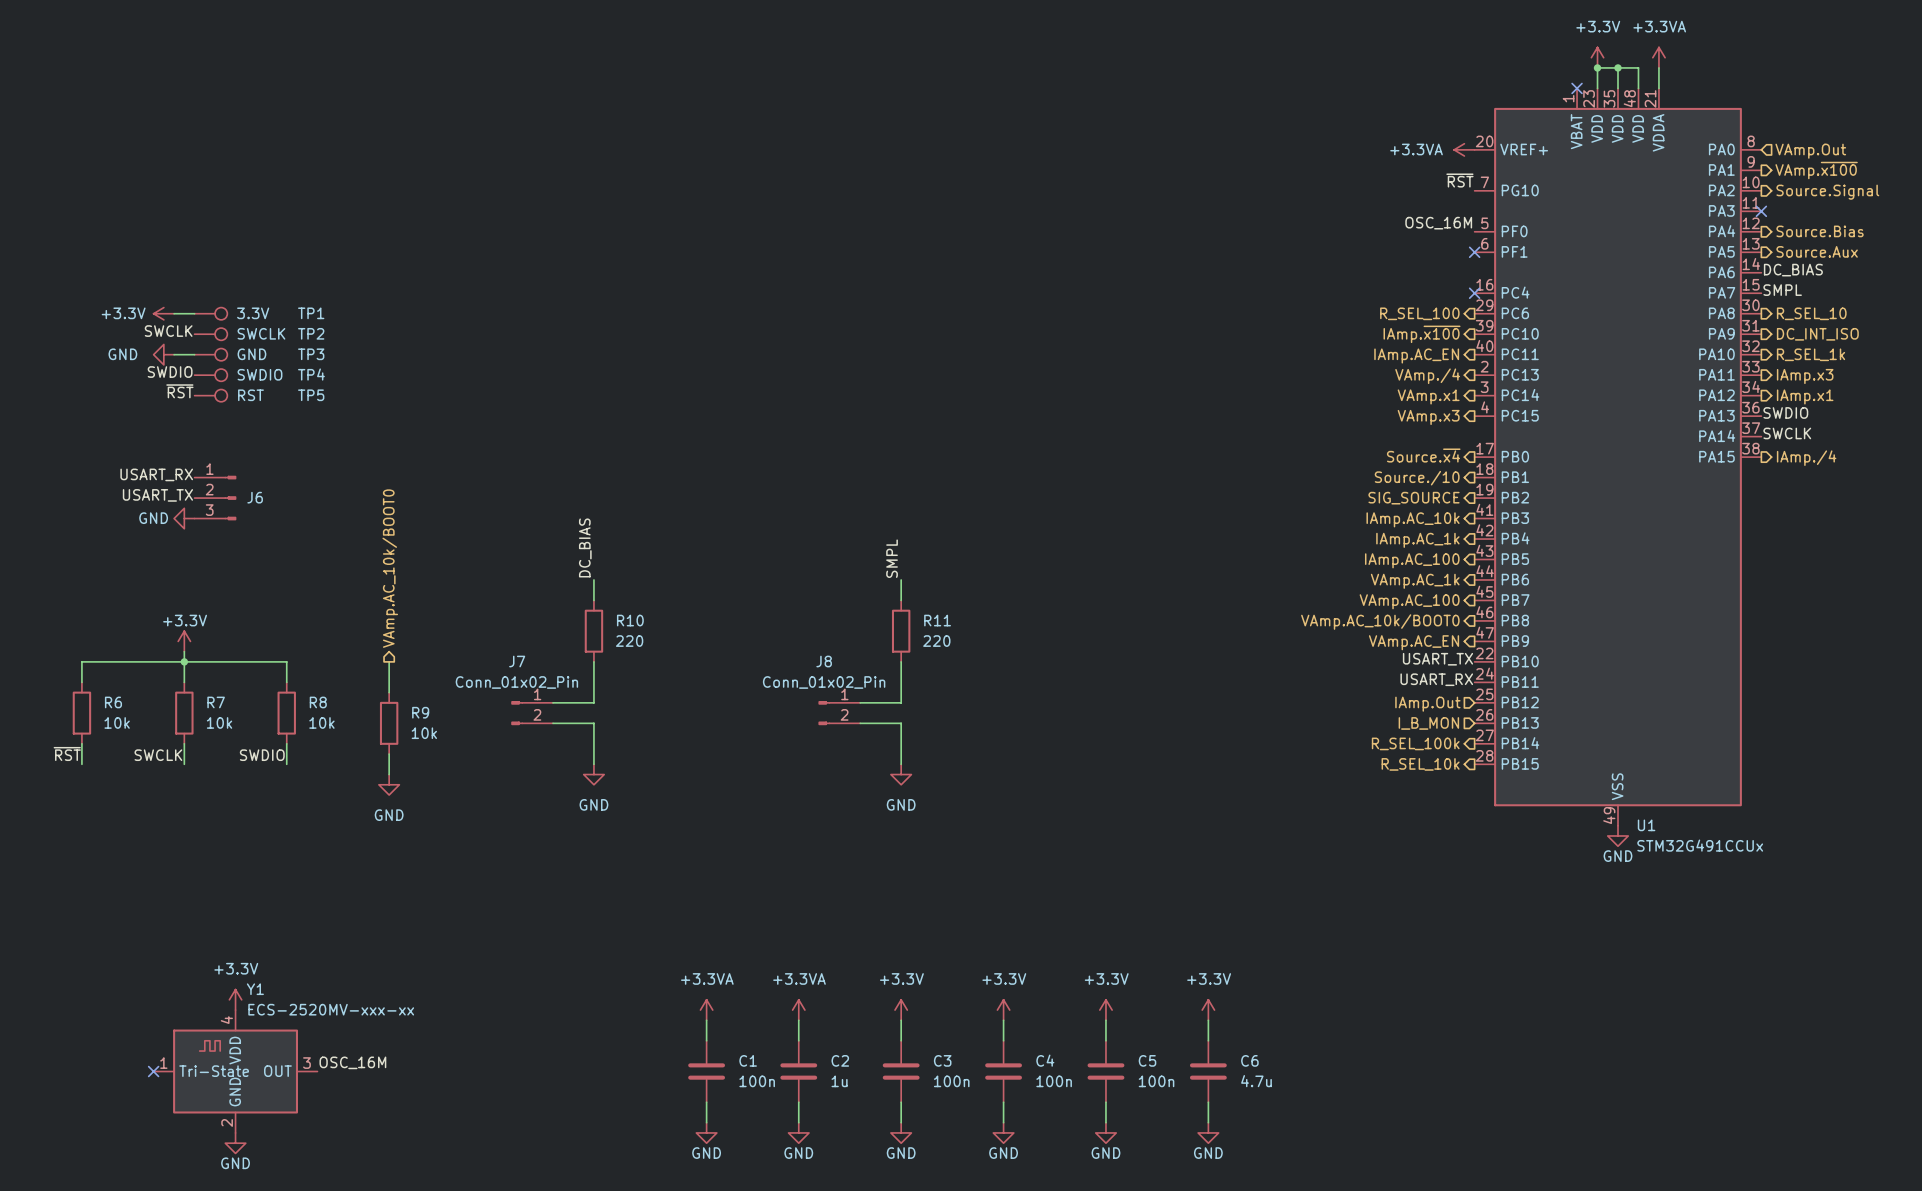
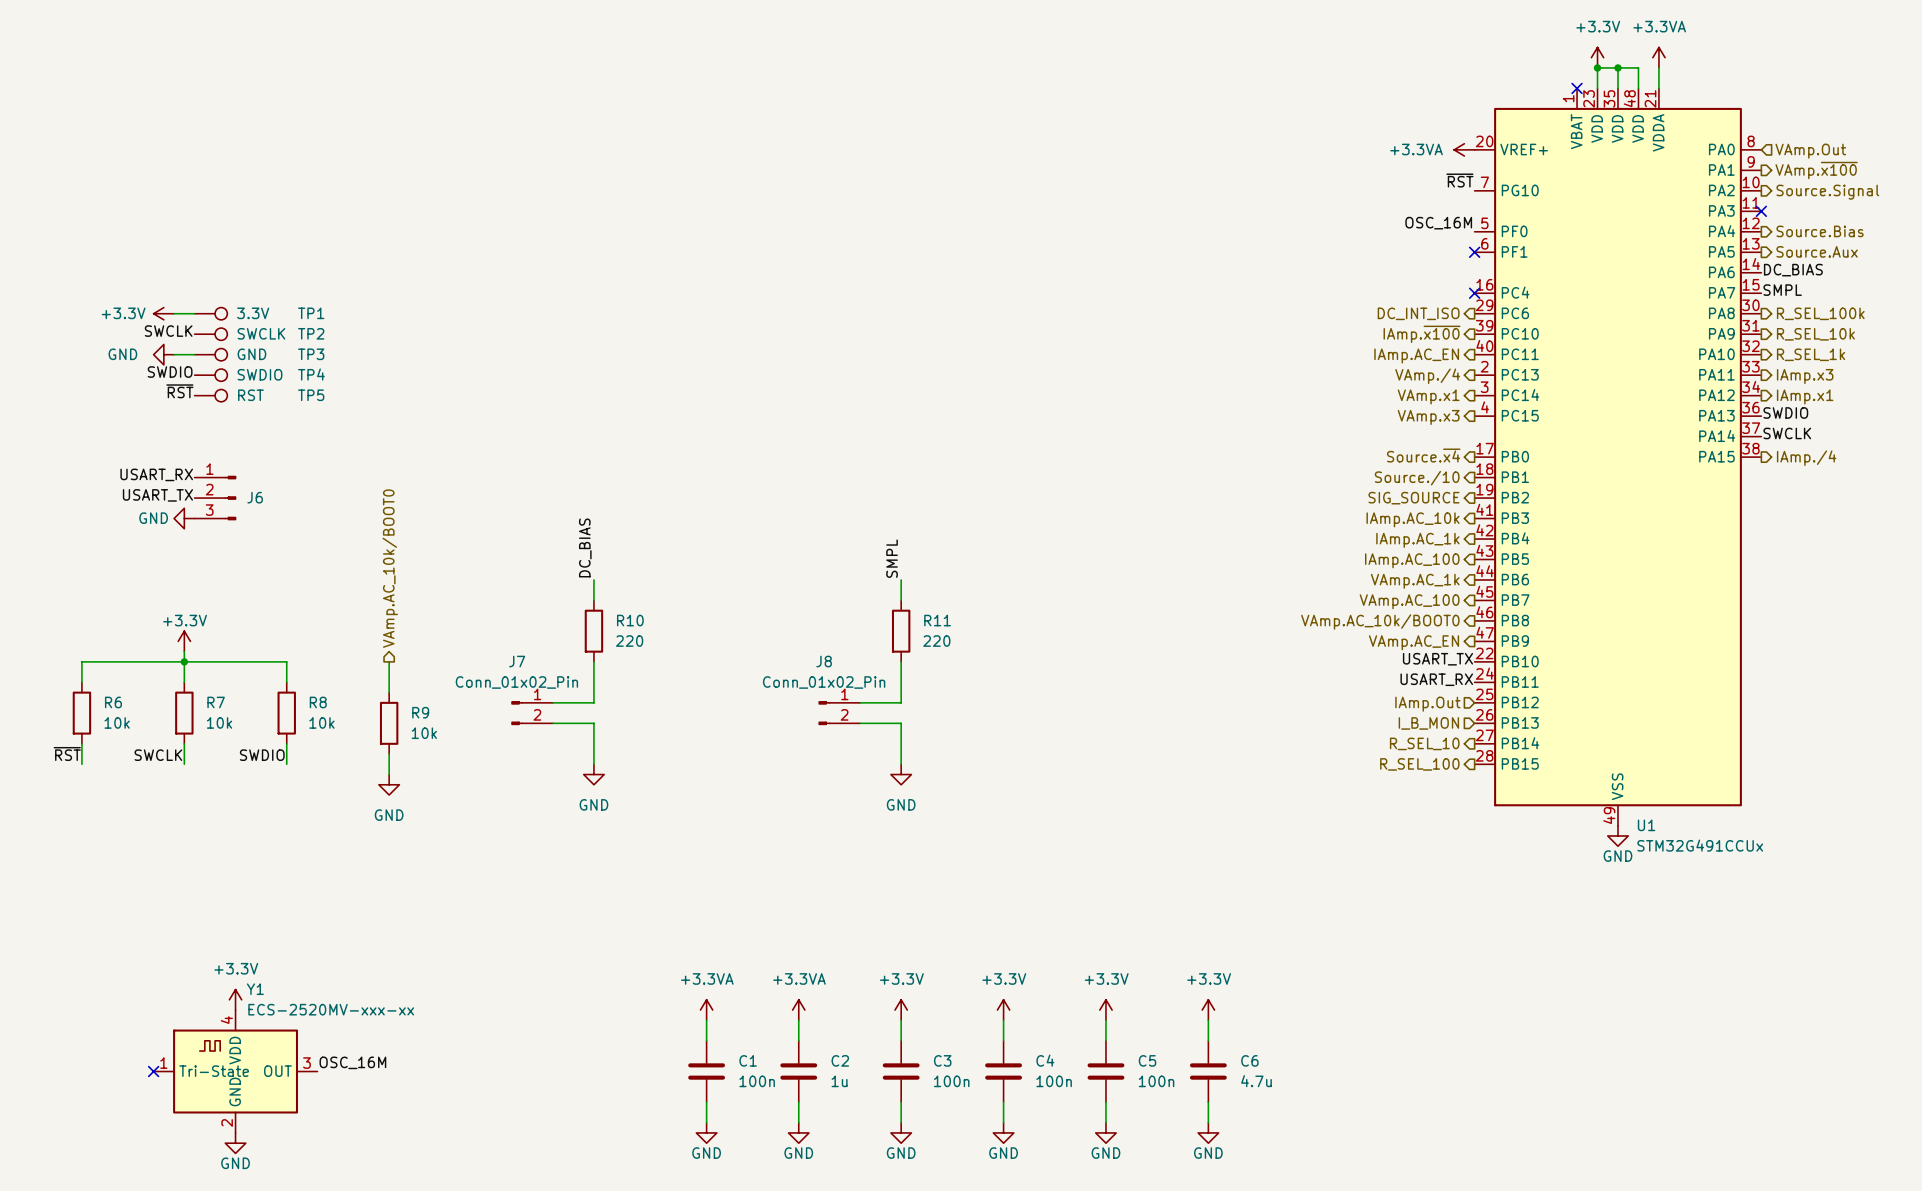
hierarchical label: R_SEL_100 (1419, 313) -> DC_INT_ISO (1418, 313)
hierarchical label: R_SEL_10 (1811, 313) -> R_SEL_100k (1820, 313)
hierarchical label: DC_INT_ISO (1817, 334) -> R_SEL_10k (1815, 334)
hierarchical label: R_SEL_100k (1415, 743) -> R_SEL_10 (1424, 743)
hierarchical label: R_SEL_10k (1420, 764) -> R_SEL_100 (1419, 764)

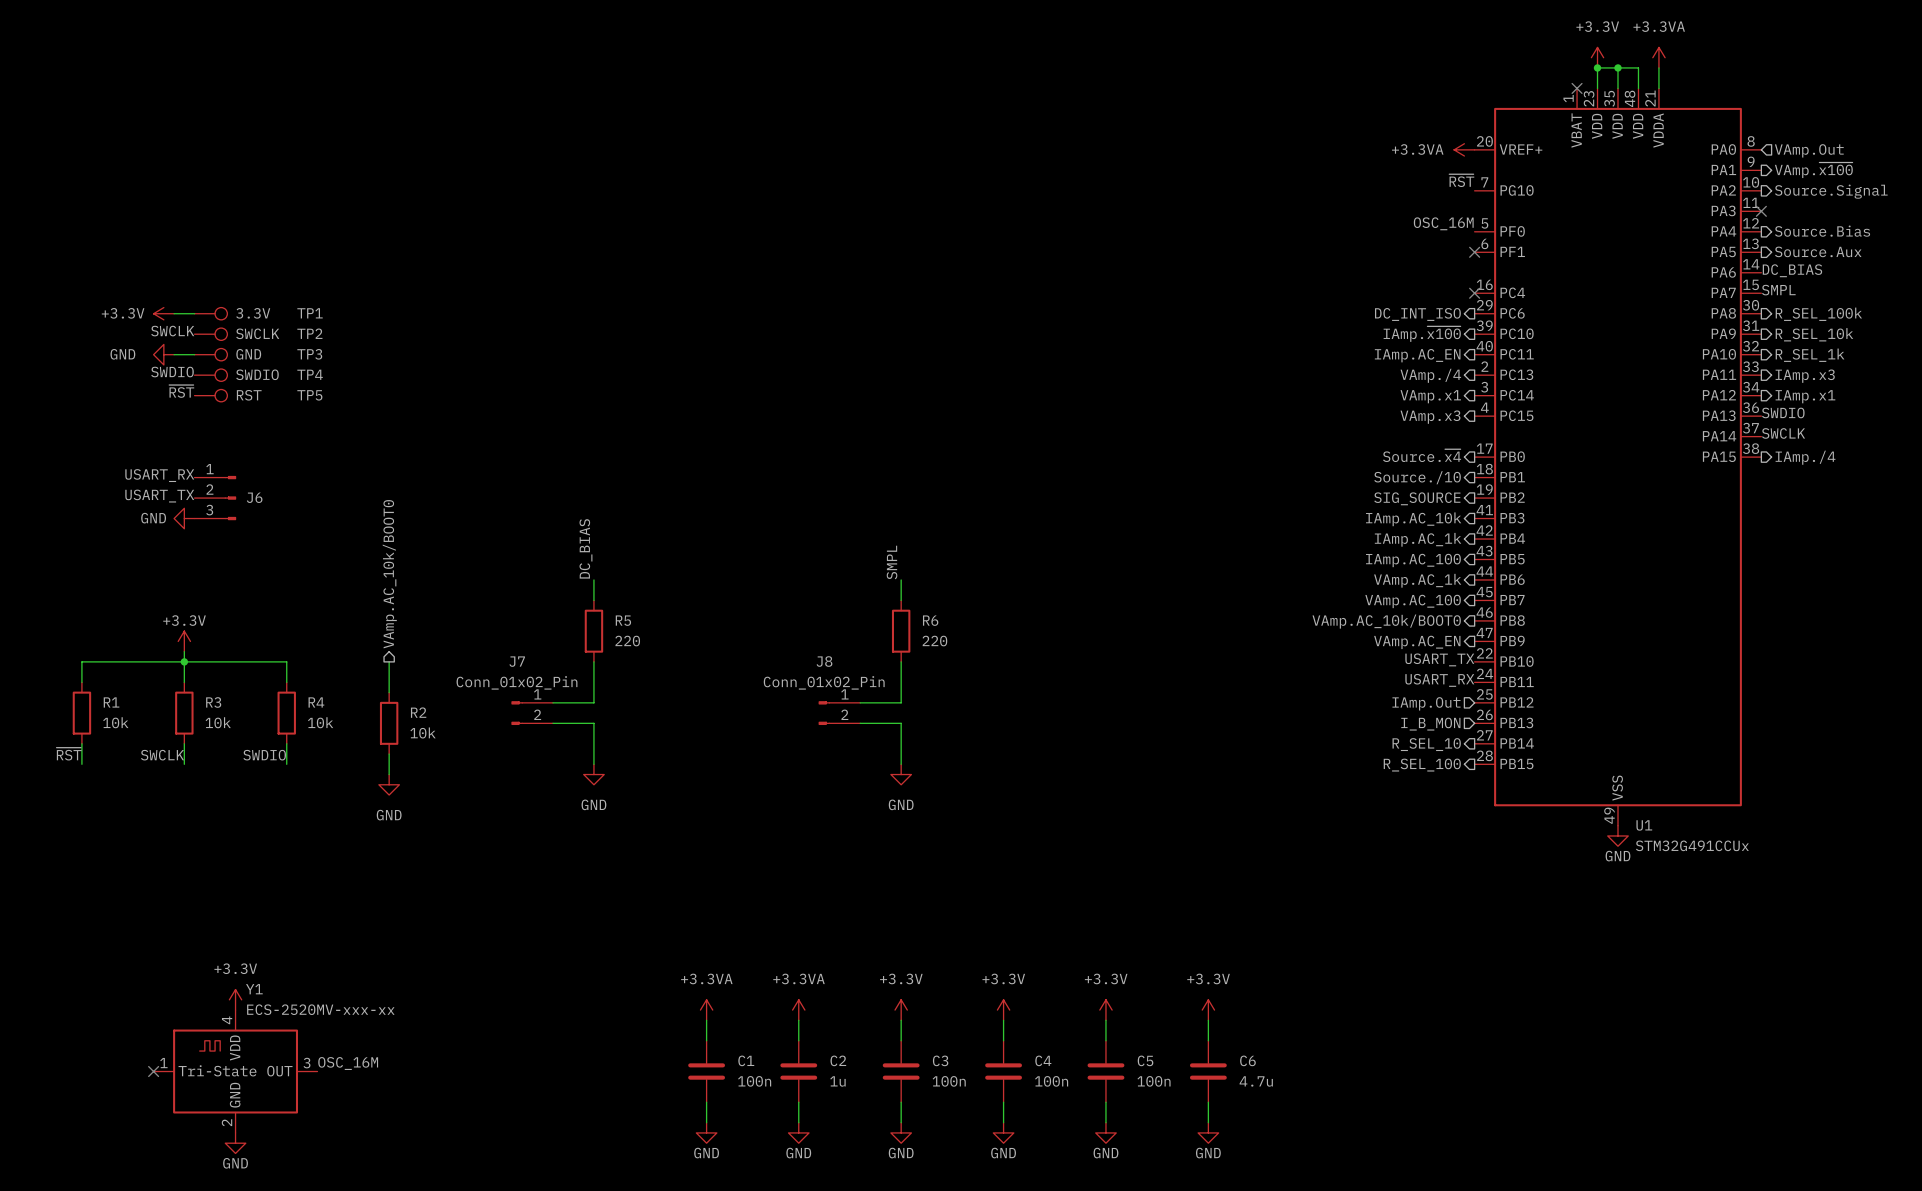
R10 name: R10 (630, 620) -> R5 (623, 620)
R11 name: R11 (937, 620) -> R6 (930, 620)
R6 name: R6 (113, 702) -> R1 (111, 702)
R7 name: R7 (216, 702) -> R3 (213, 702)
R8 name: R8 (318, 702) -> R4 (316, 702)
R9 name: R9 (420, 712) -> R2 (418, 712)

